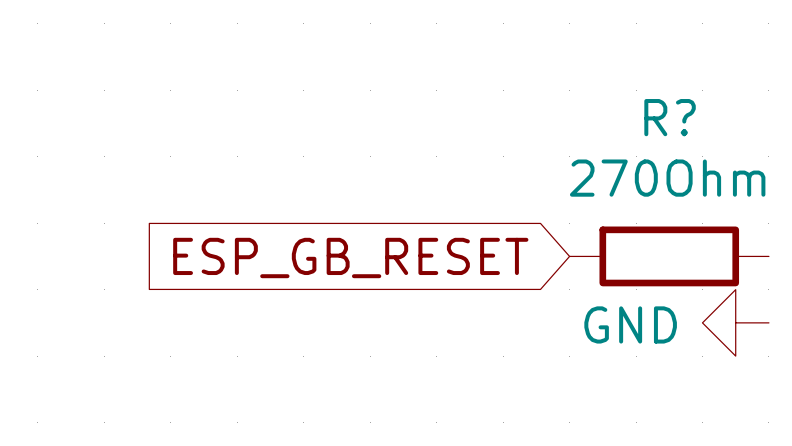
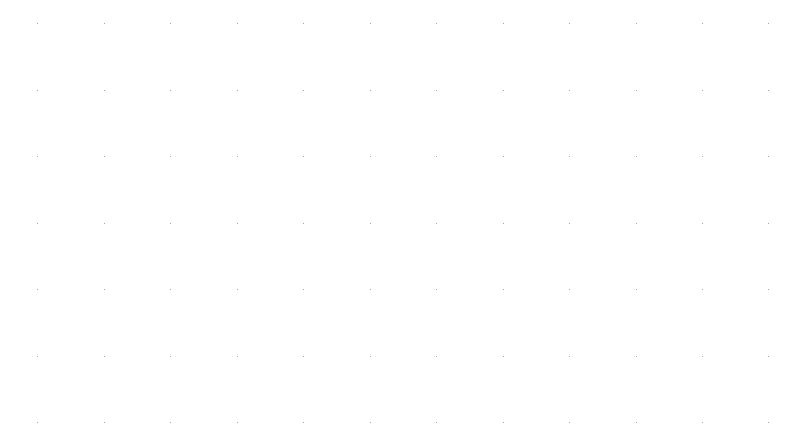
R?: 270Ohm (669, 256) -> none
global label: ESP_GB_RESET (350, 258) -> none
power symbol: GND (735, 322) -> none

